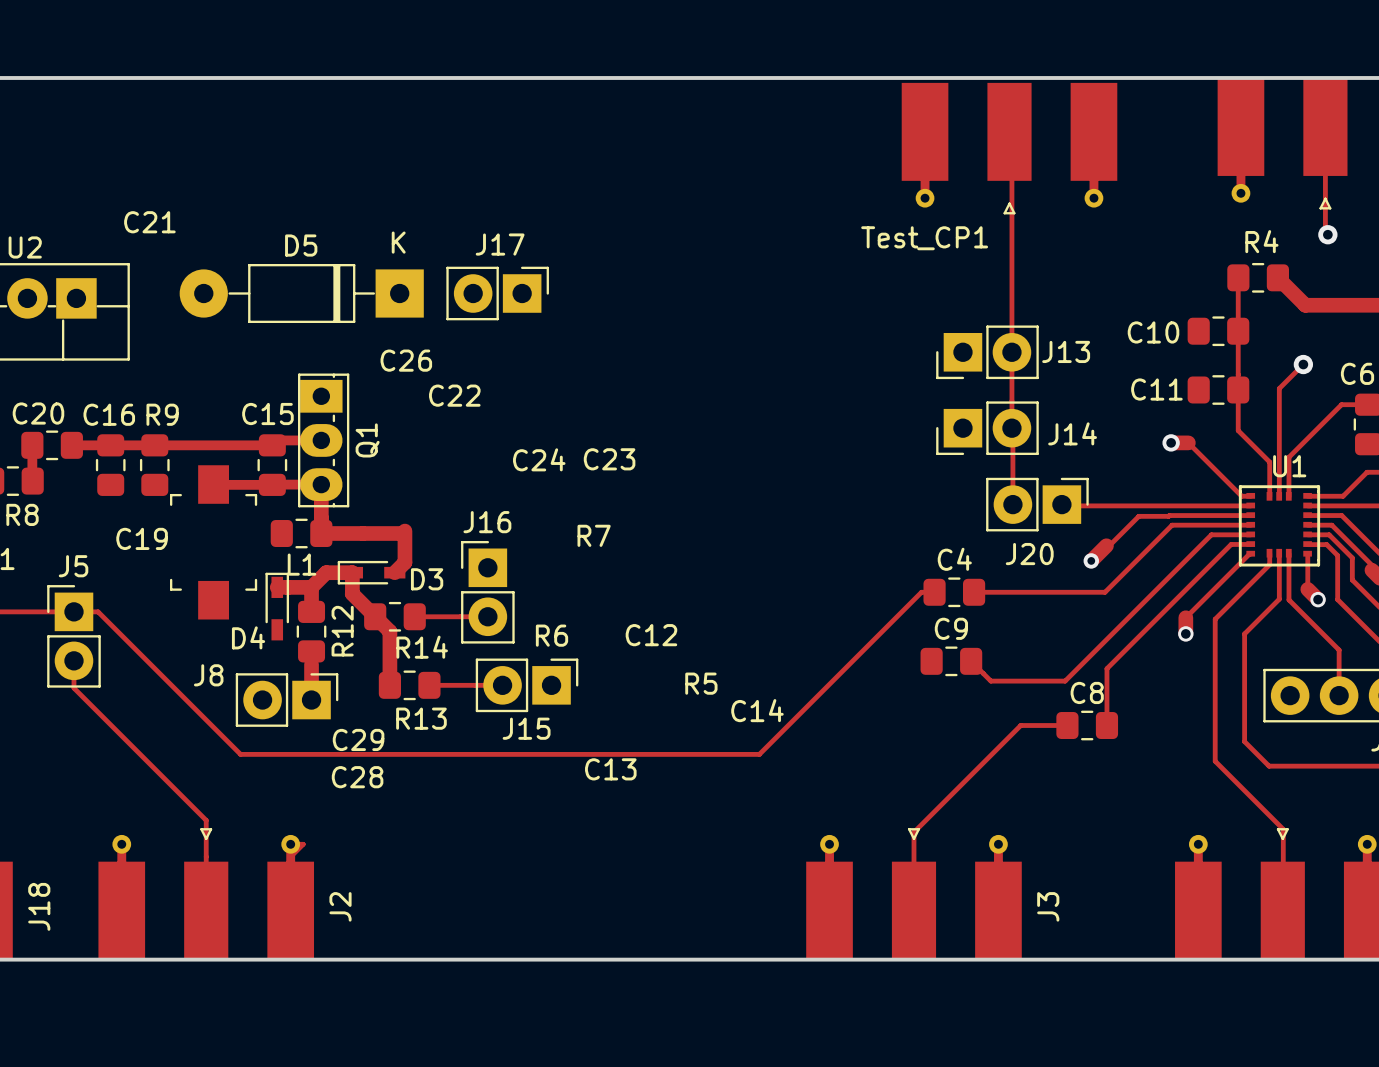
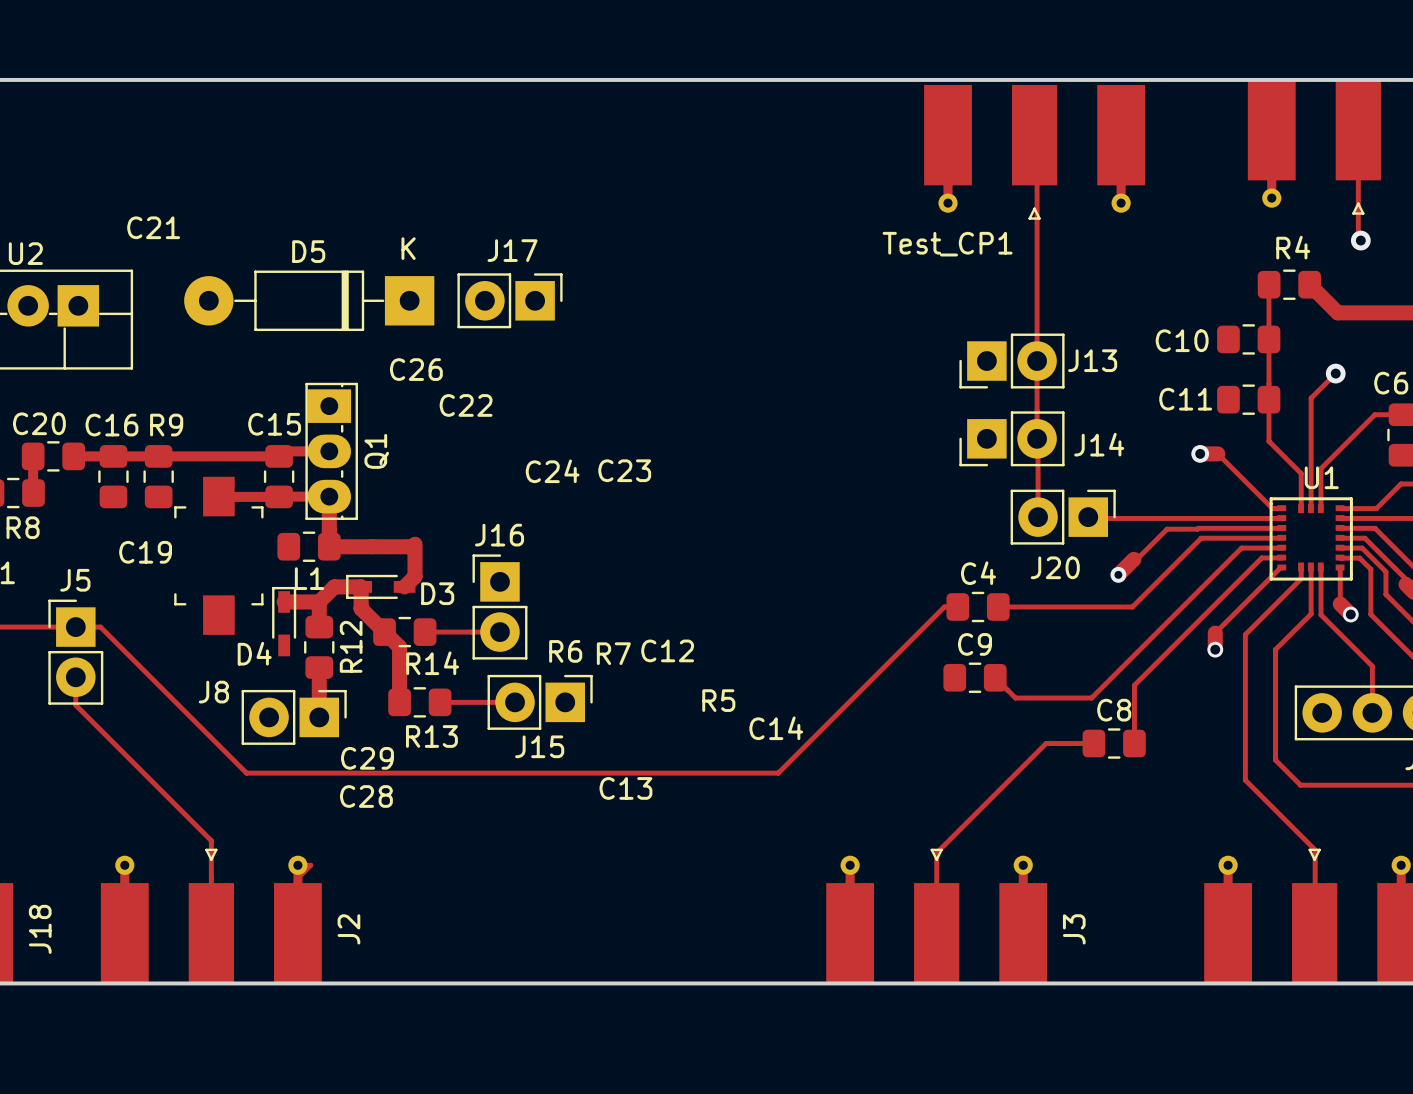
R7 position: (594, 535) -> (613, 653)

